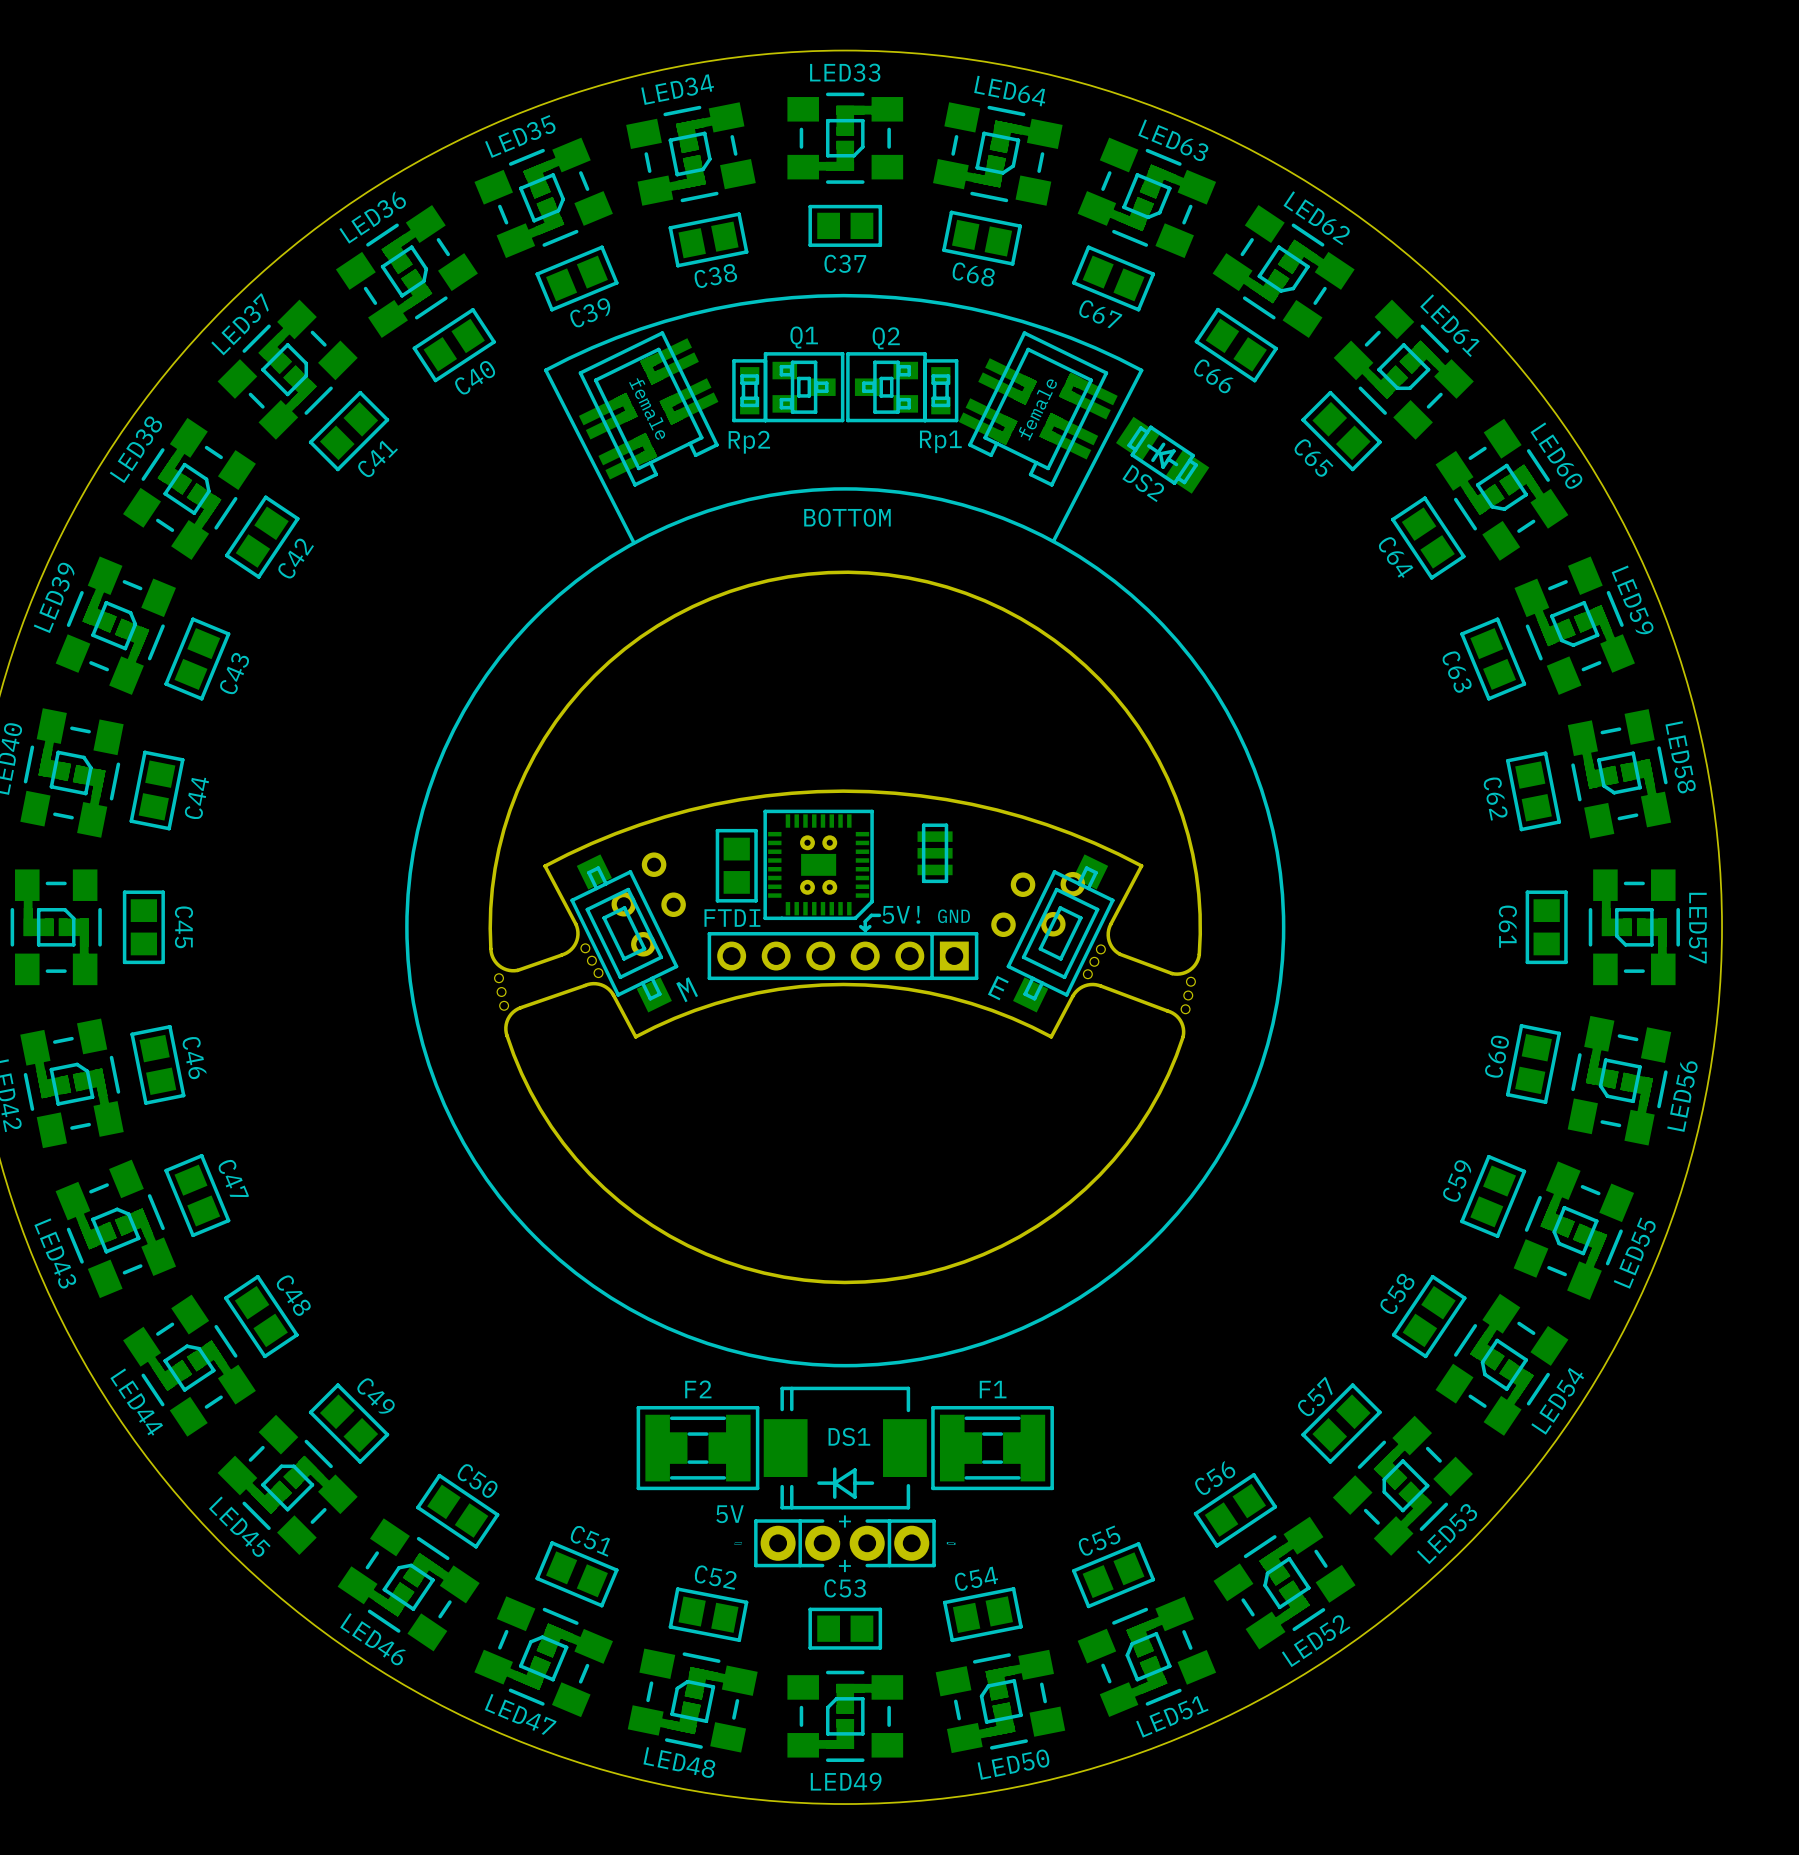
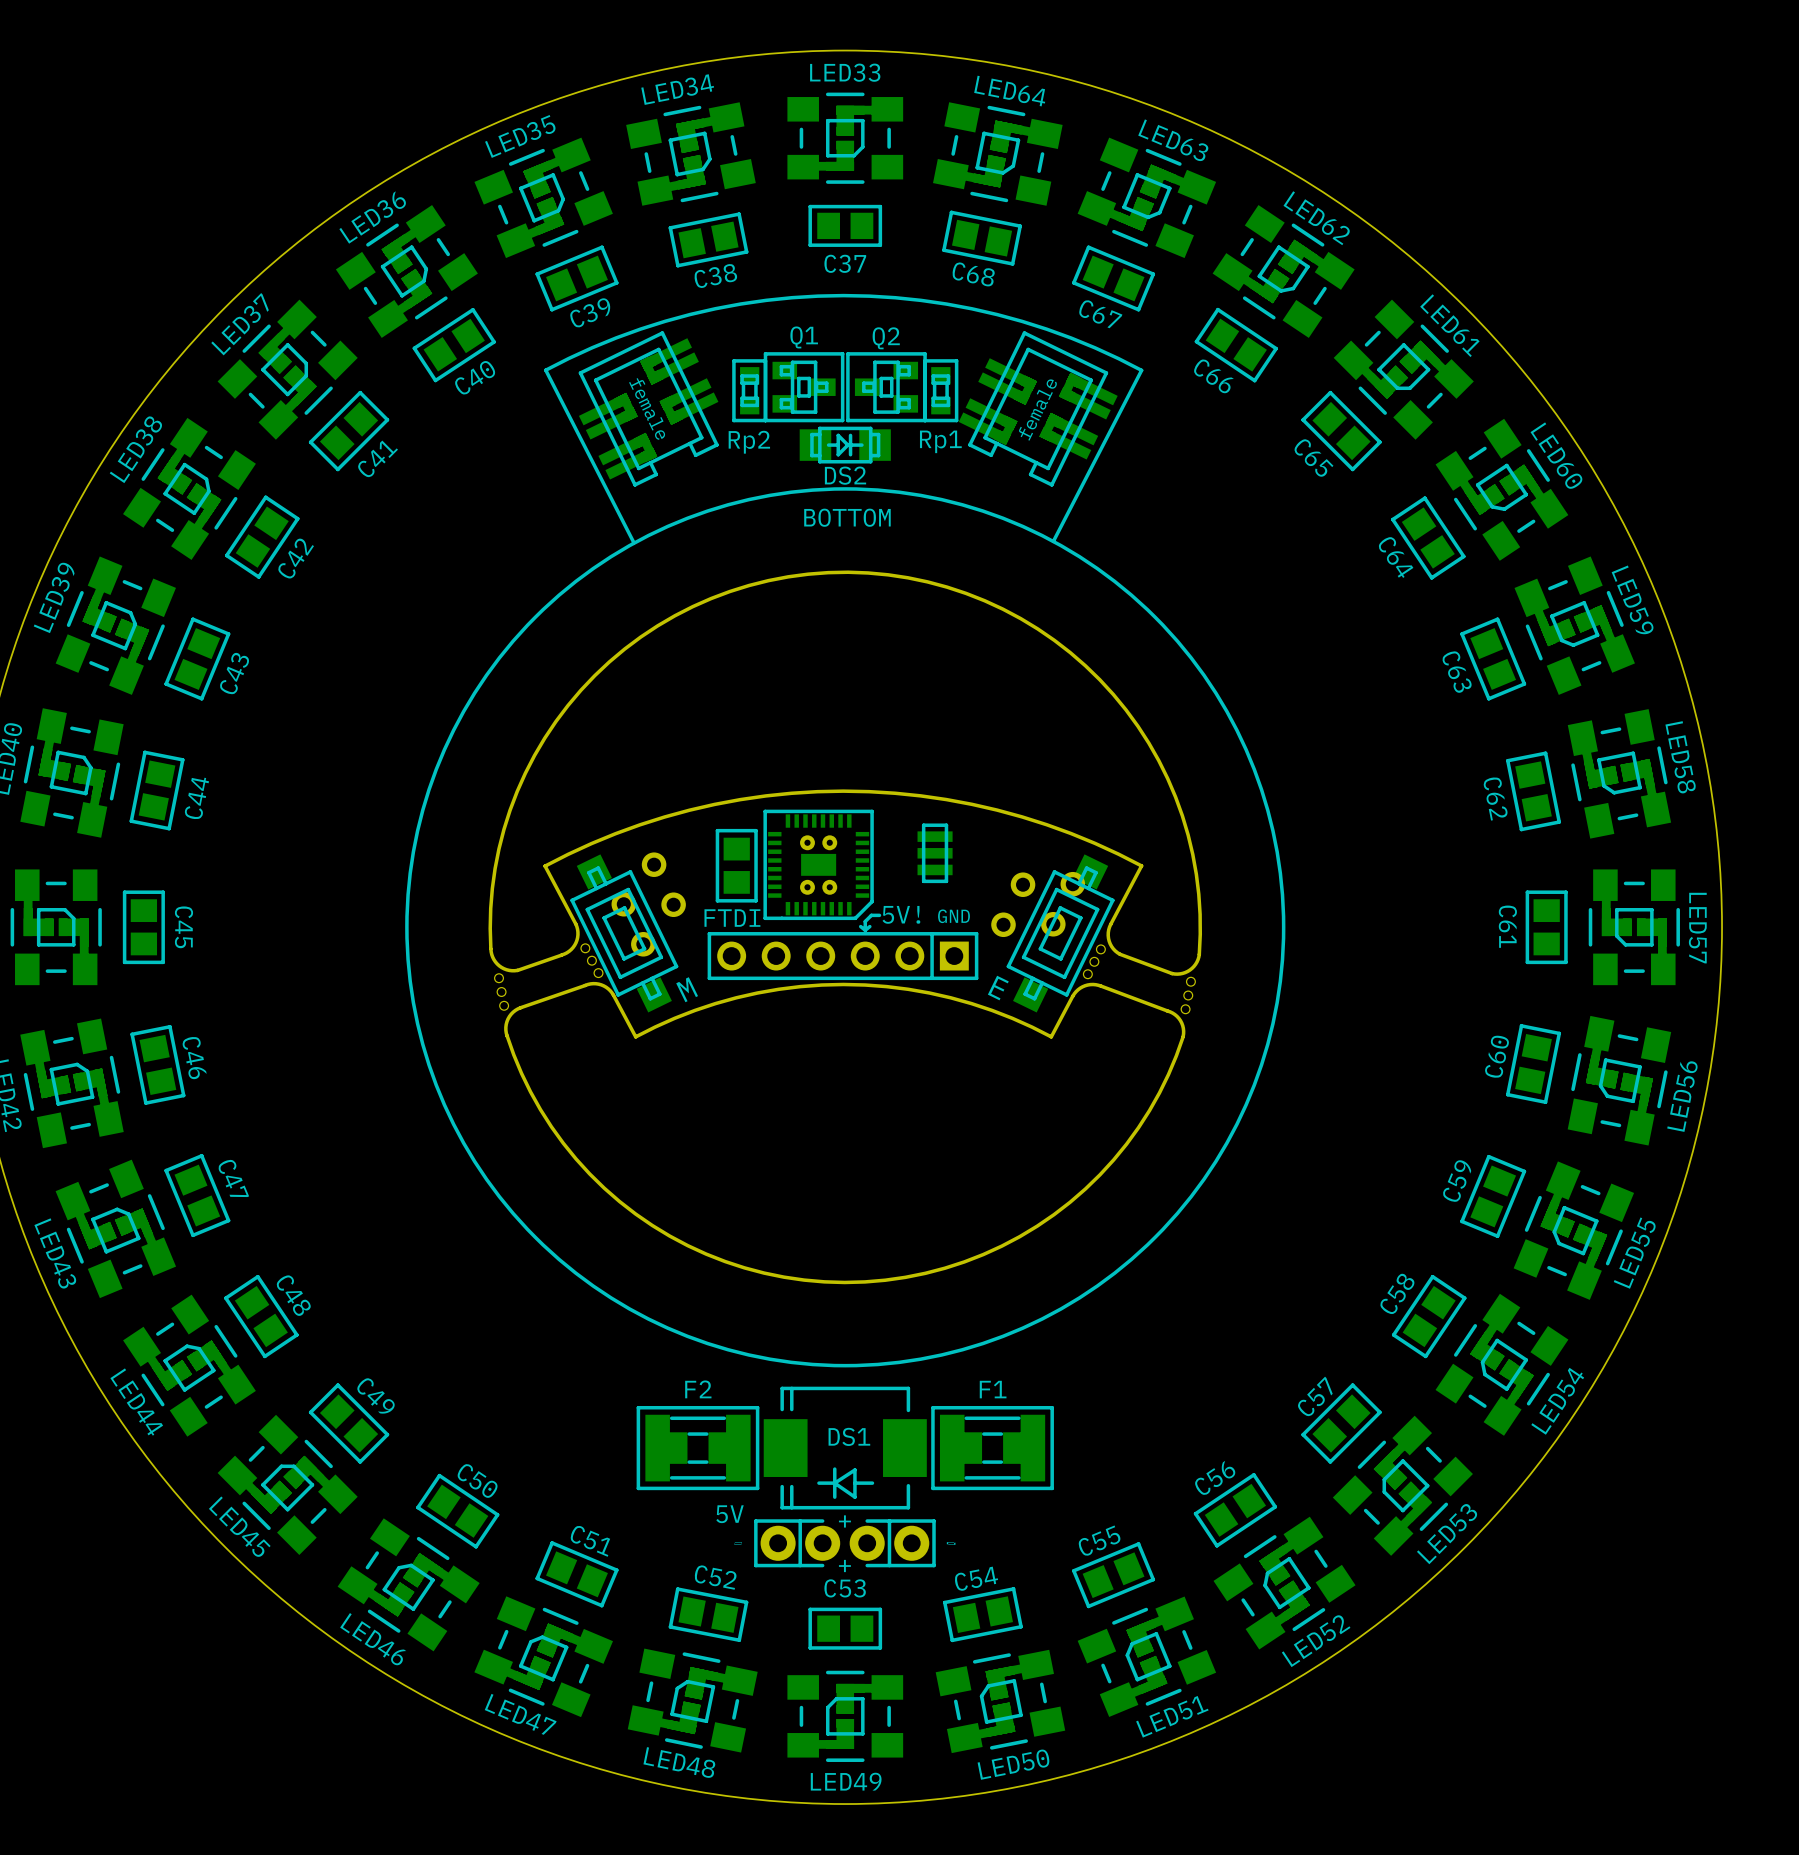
DS2 rotation: 0° (1162, 455) -> 146.2° clockwise (845, 445)
DS2 position: (1162, 455) -> (845, 445)

